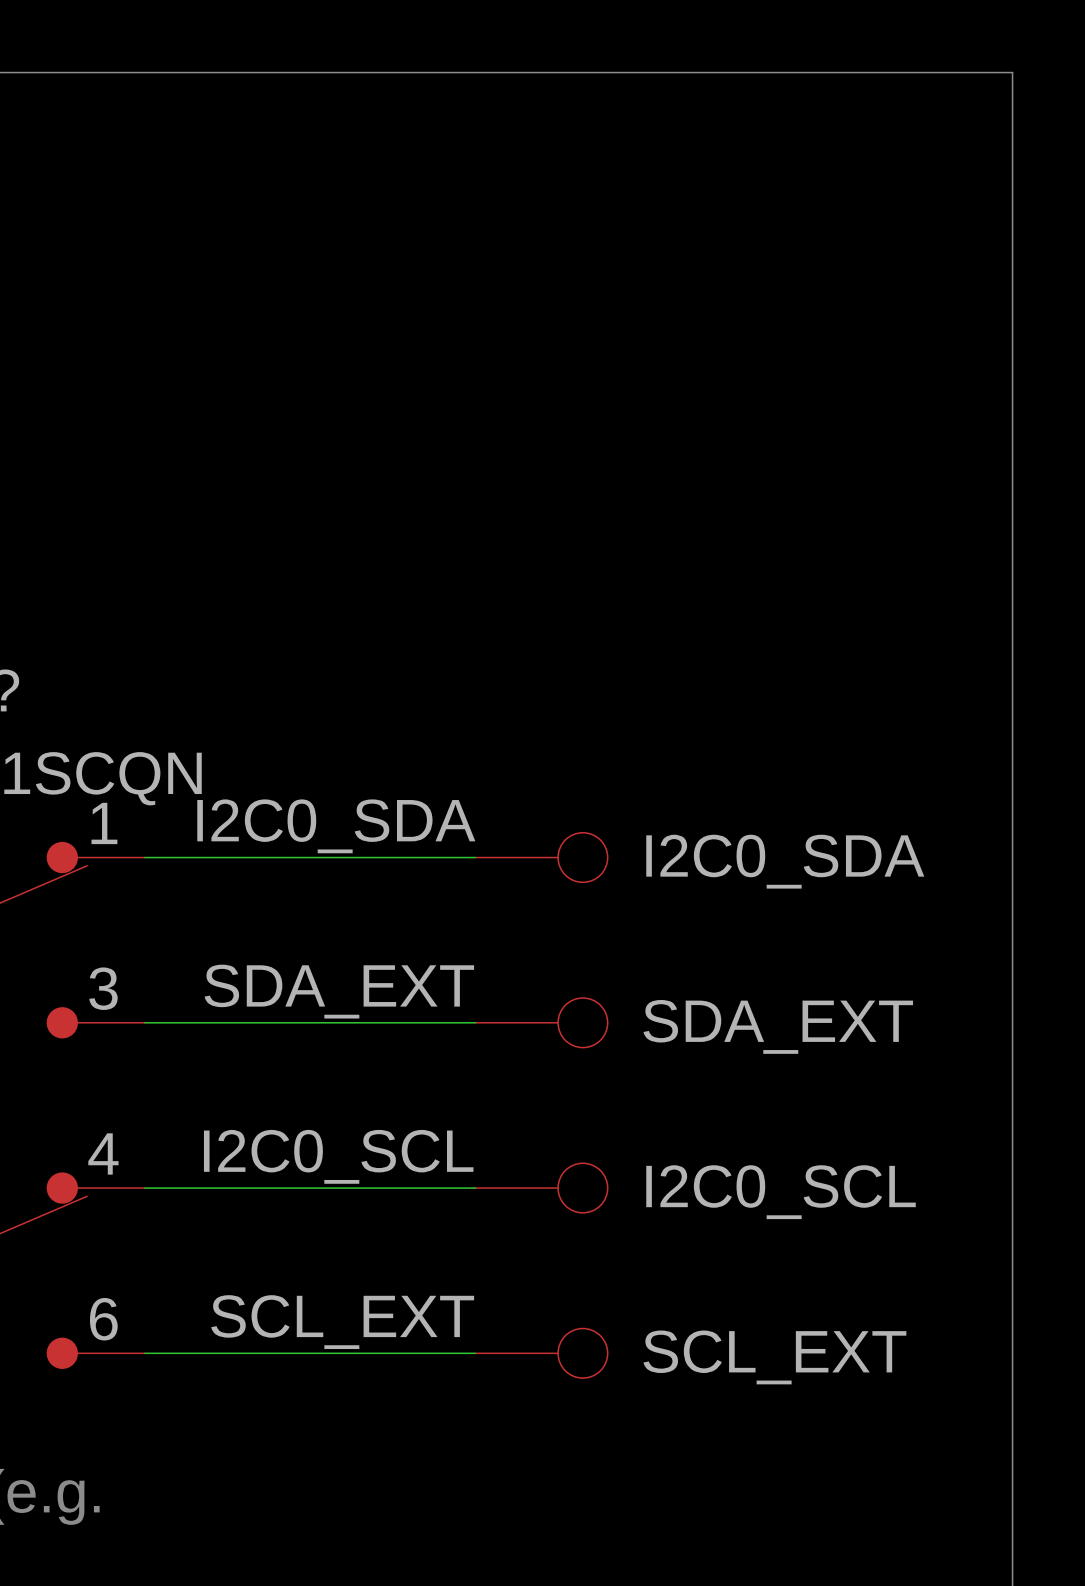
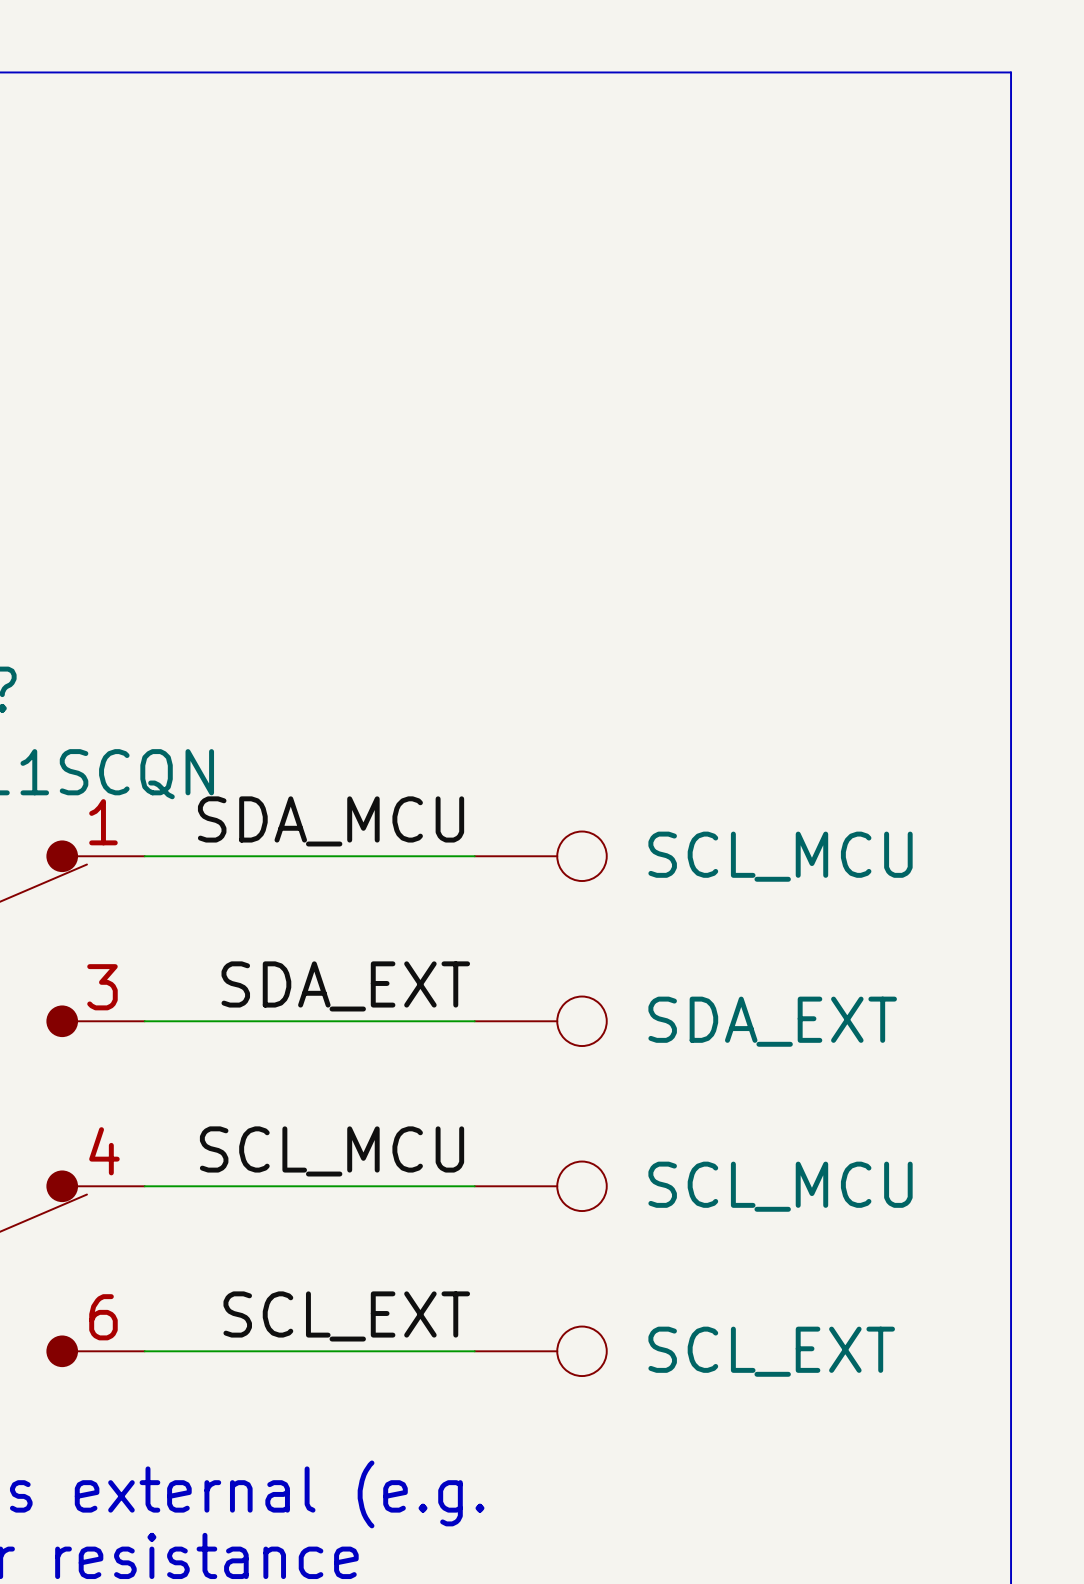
label: I2C0_SDA (336, 826) -> SDA_MCU (331, 821)
part value: I2C0_SDA (785, 861) -> SCL_MCU (780, 856)
label: I2C0_SCL (338, 1156) -> SCL_MCU (332, 1151)
part value: I2C0_SCL (781, 1192) -> SCL_MCU (780, 1186)

